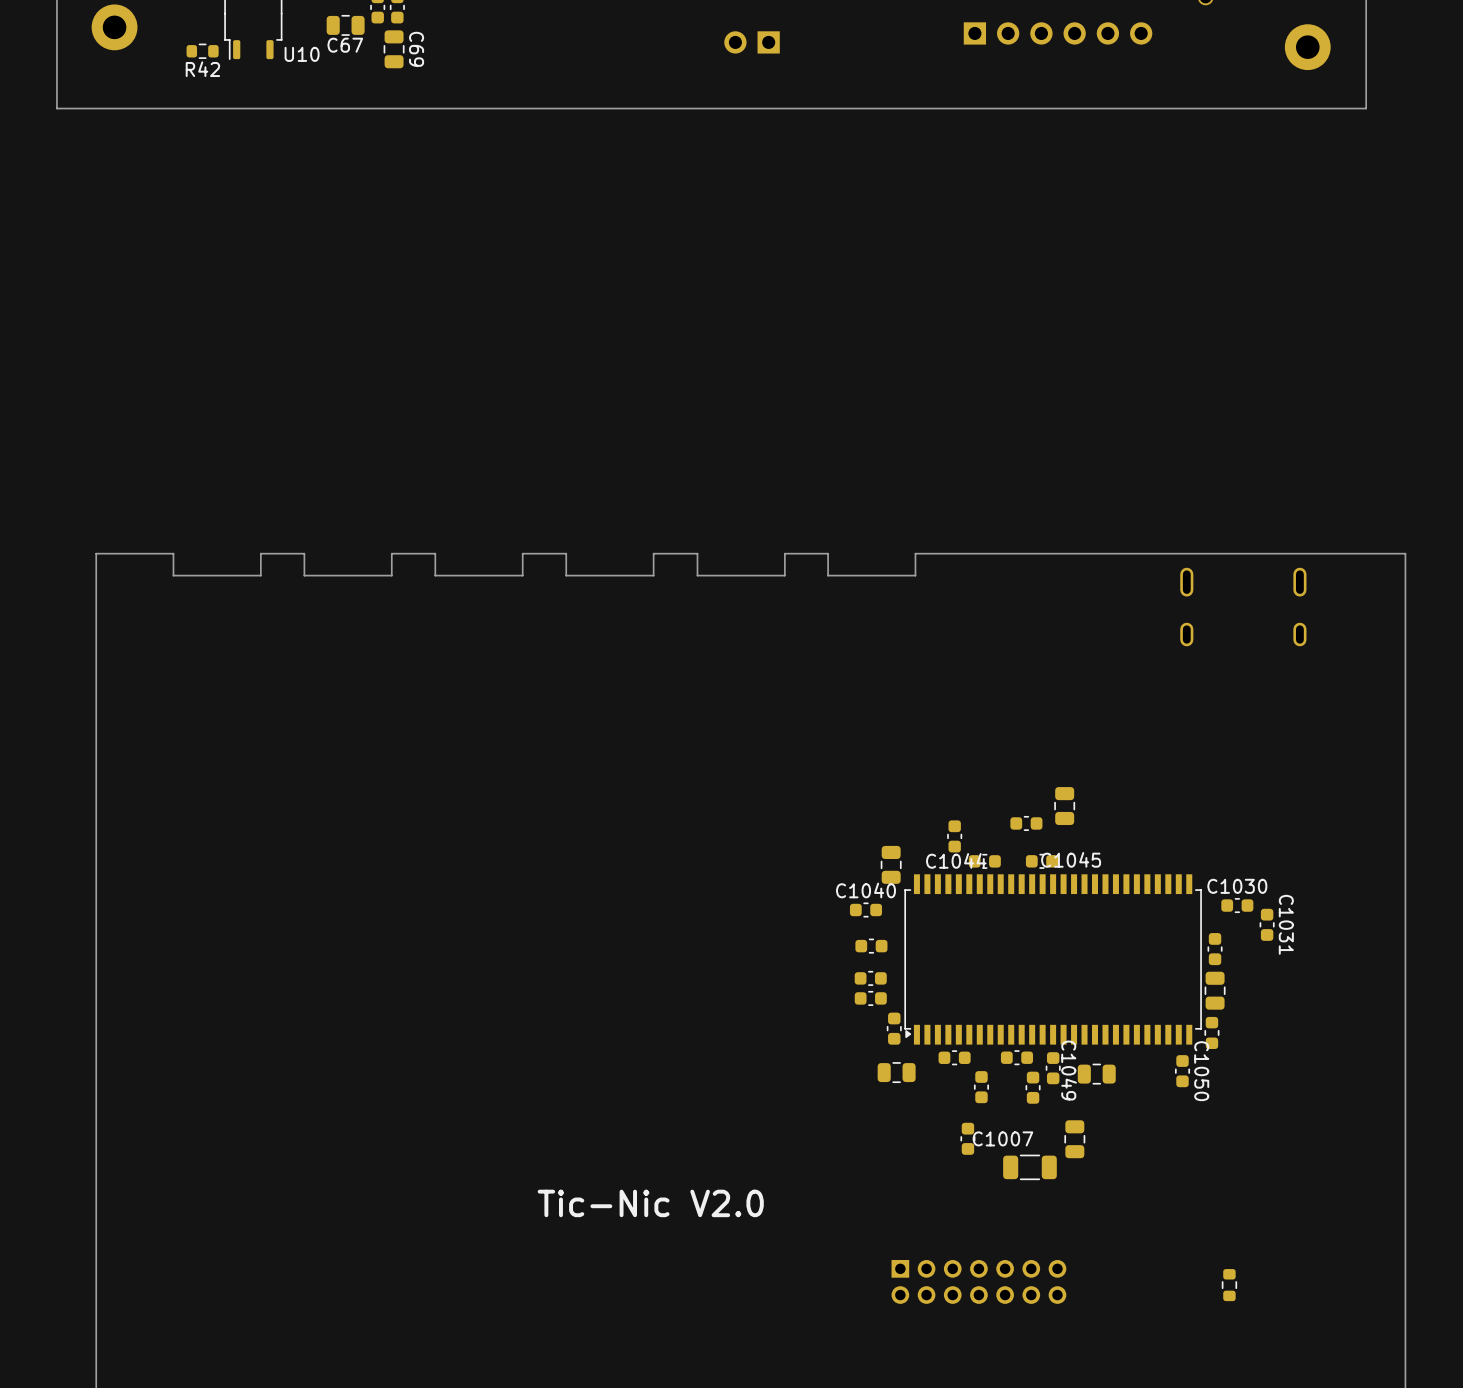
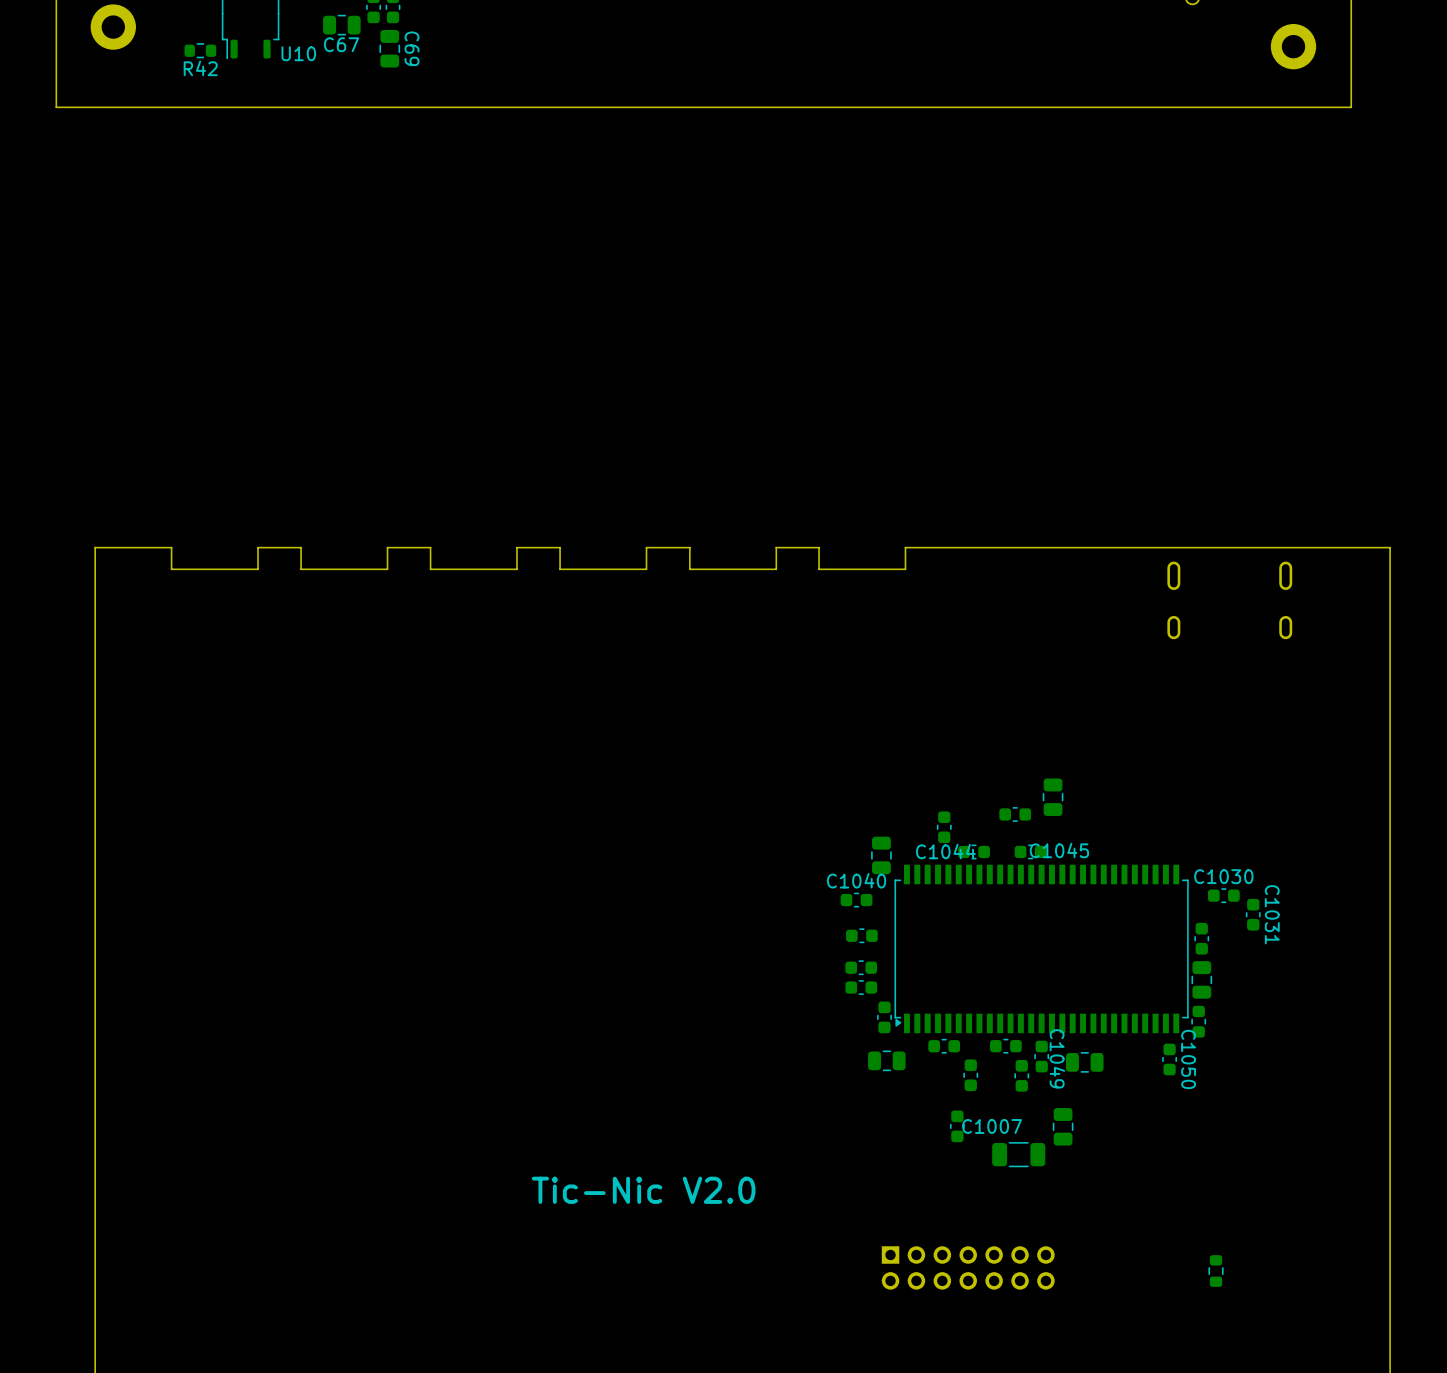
part: (1058, 33) -> none
part: (752, 42) -> none

